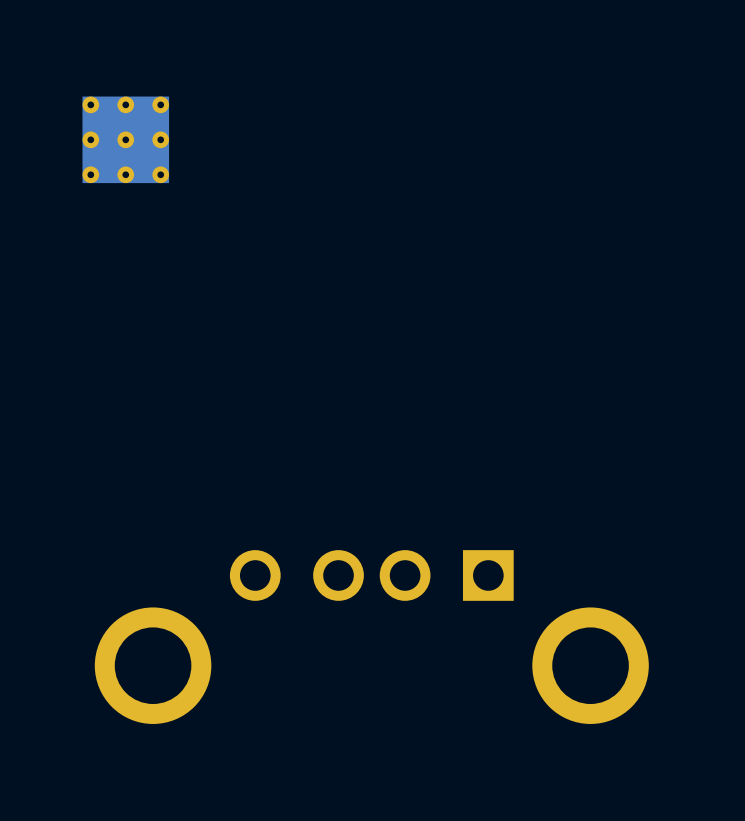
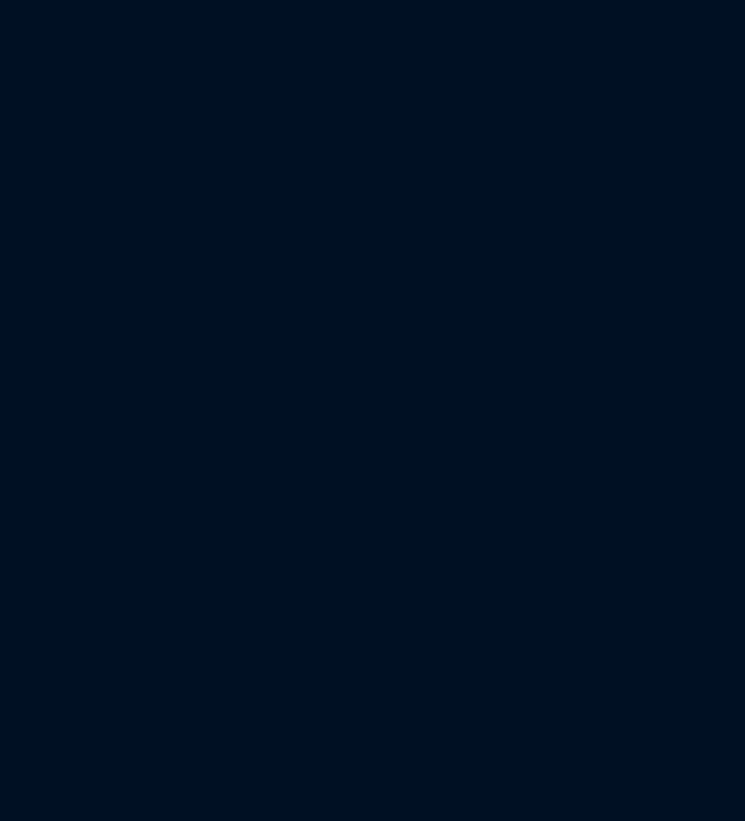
part: (125, 139) -> none
part: (371, 637) -> none

